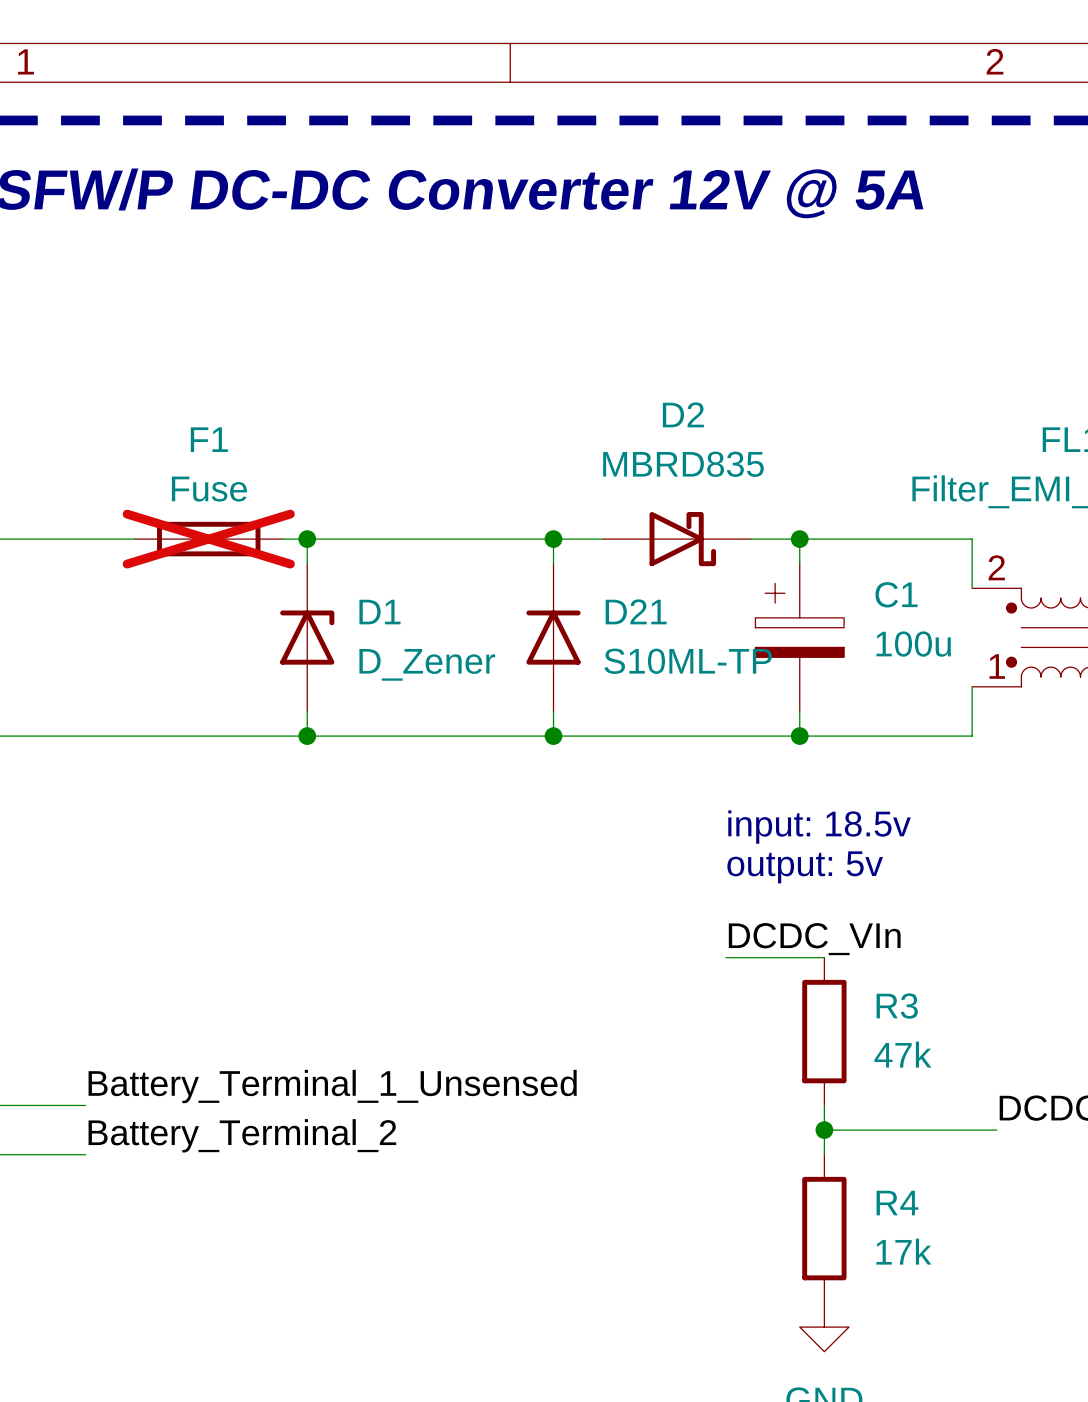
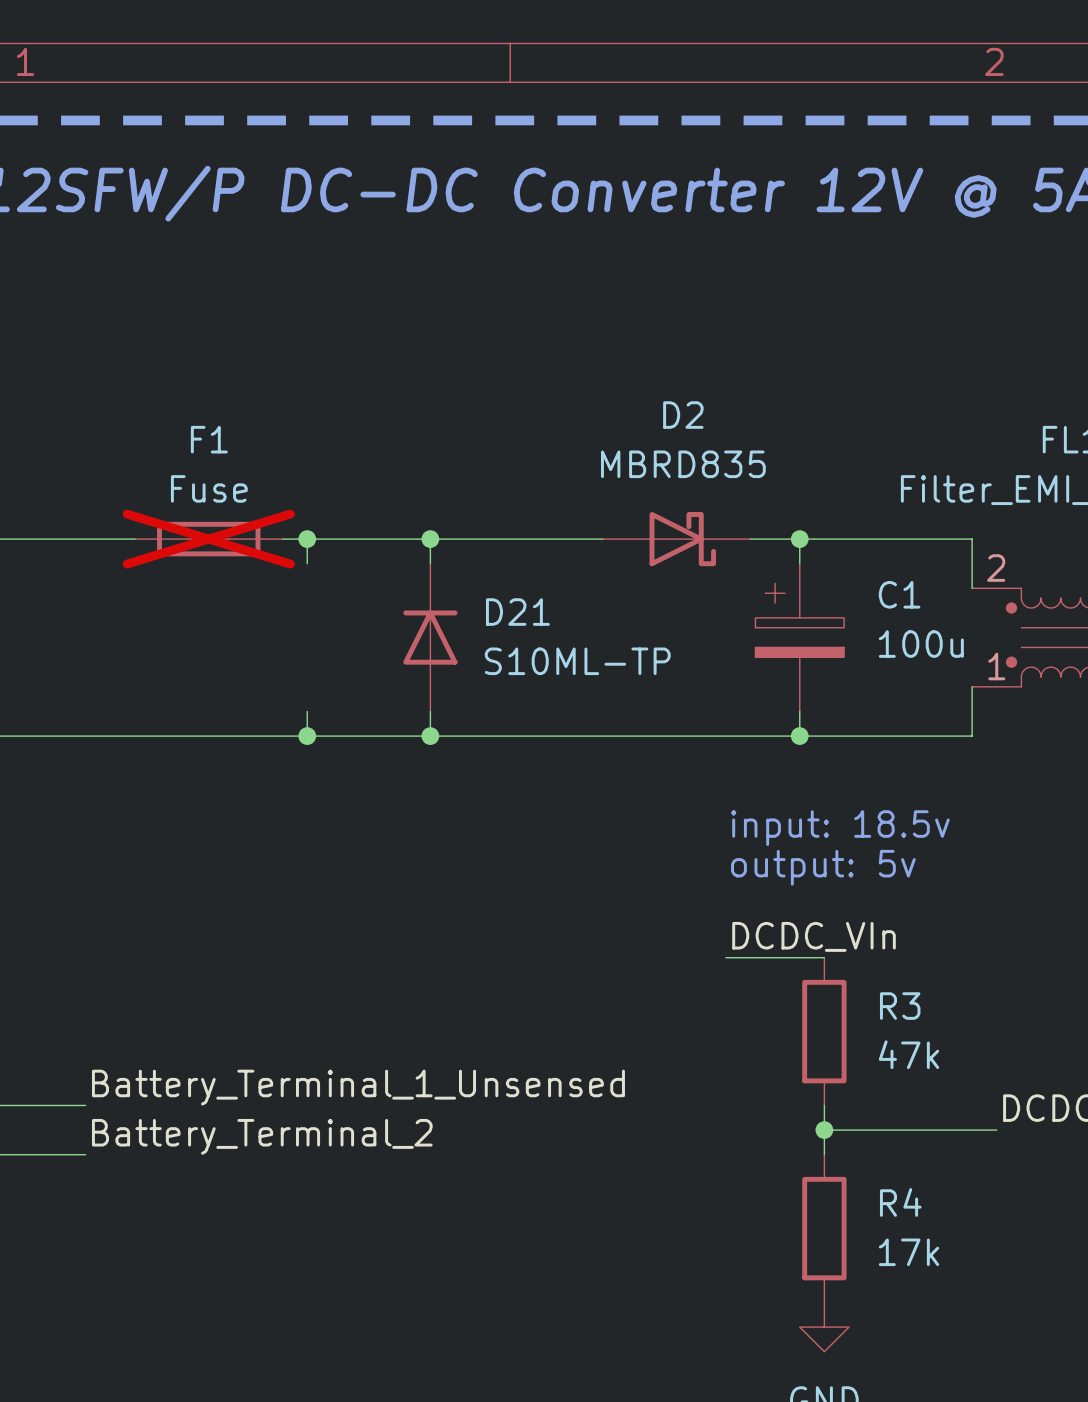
junction: none -> (430, 539)
wire: (553, 539) (553, 563) -> (430, 539) (430, 563)
junction: (553, 539) -> none
D1: D_Zener (307, 637) -> none
D21 position: (553, 637) -> (430, 637)
wire: (553, 711) (553, 736) -> (430, 711) (430, 736)
junction: none -> (430, 736)
junction: (553, 736) -> none

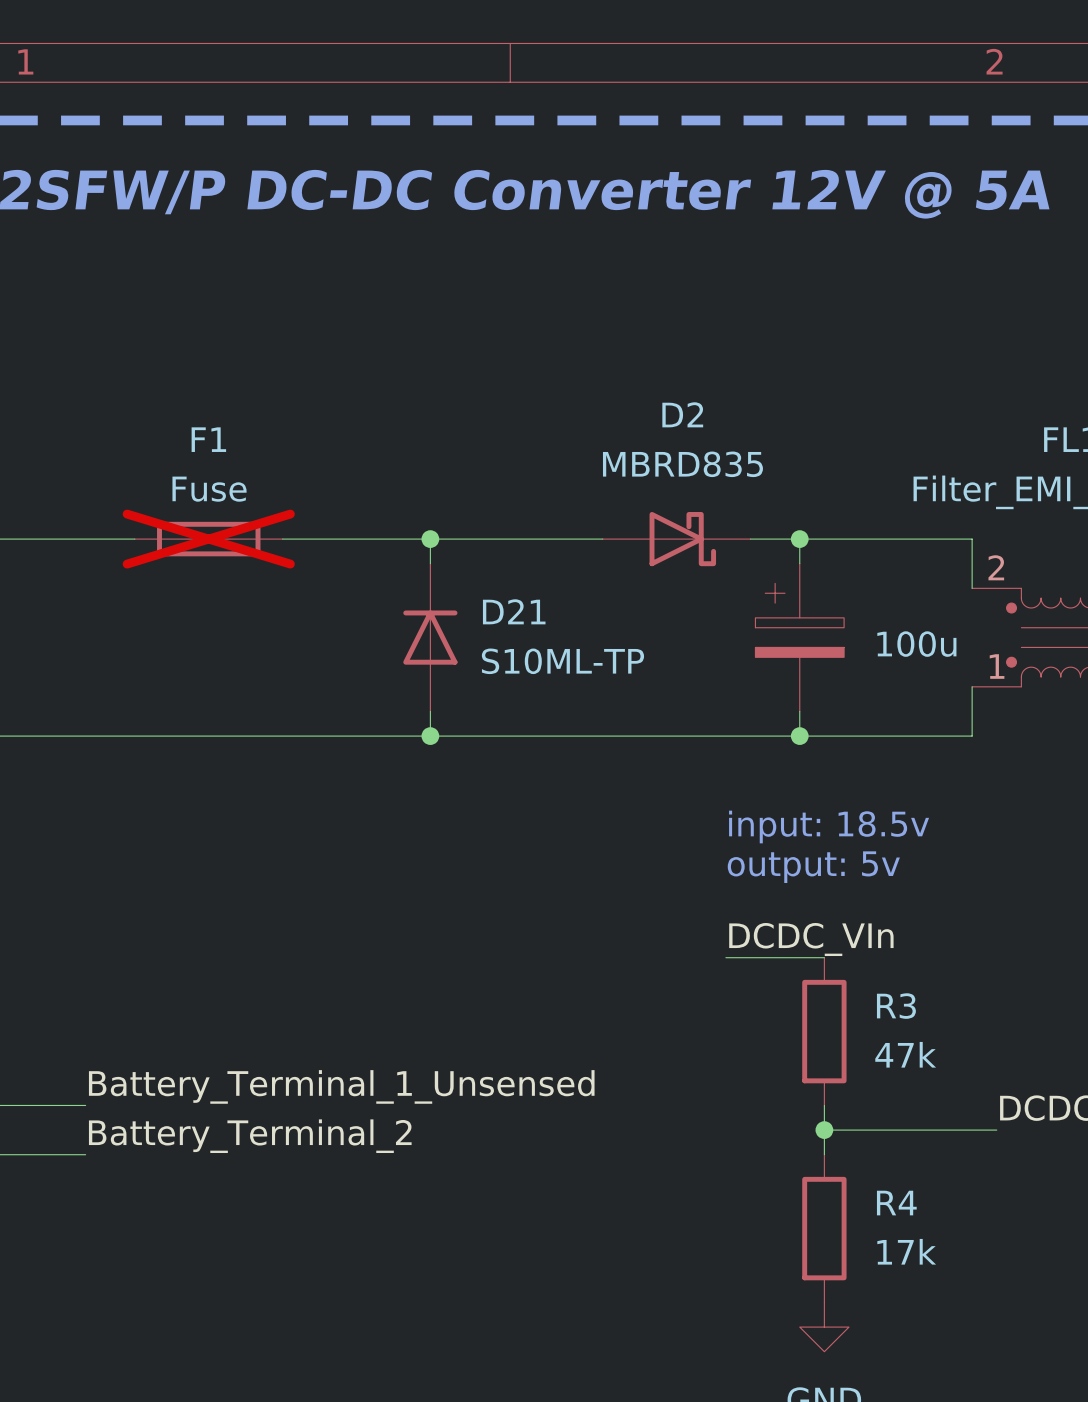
wire: (307, 539) (307, 563) -> none
junction: (307, 539) -> none
C1 name: C1 (899, 594) -> none
wire: (307, 711) (307, 736) -> none
junction: (307, 736) -> none

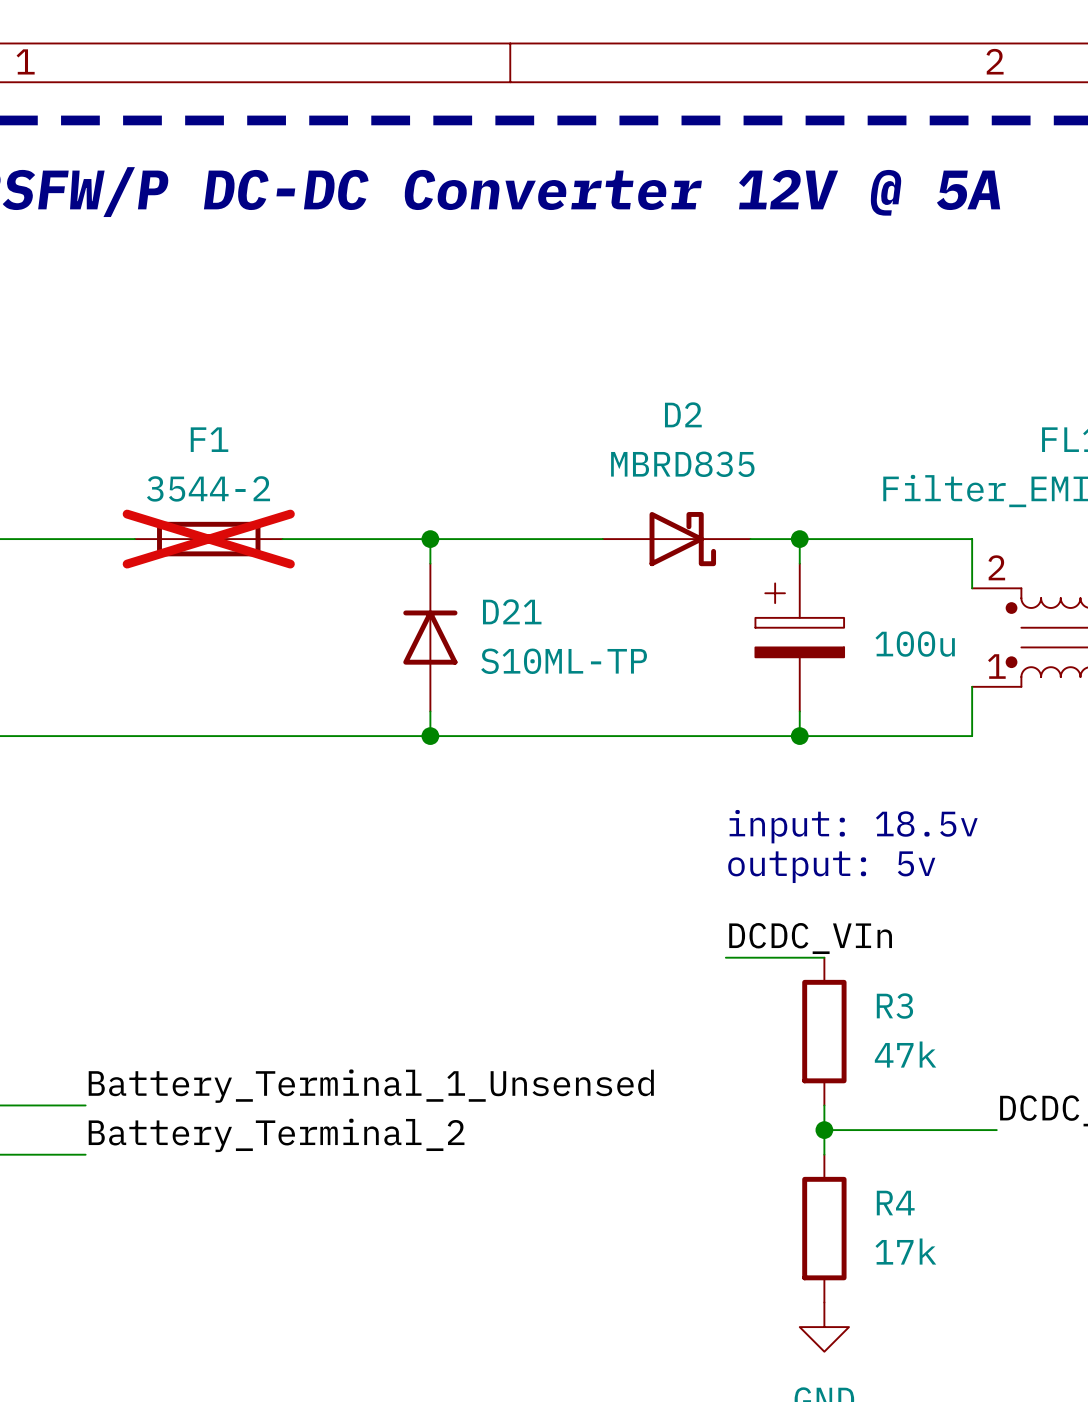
F1 value: Fuse (209, 489) -> 3544-2 (208, 488)

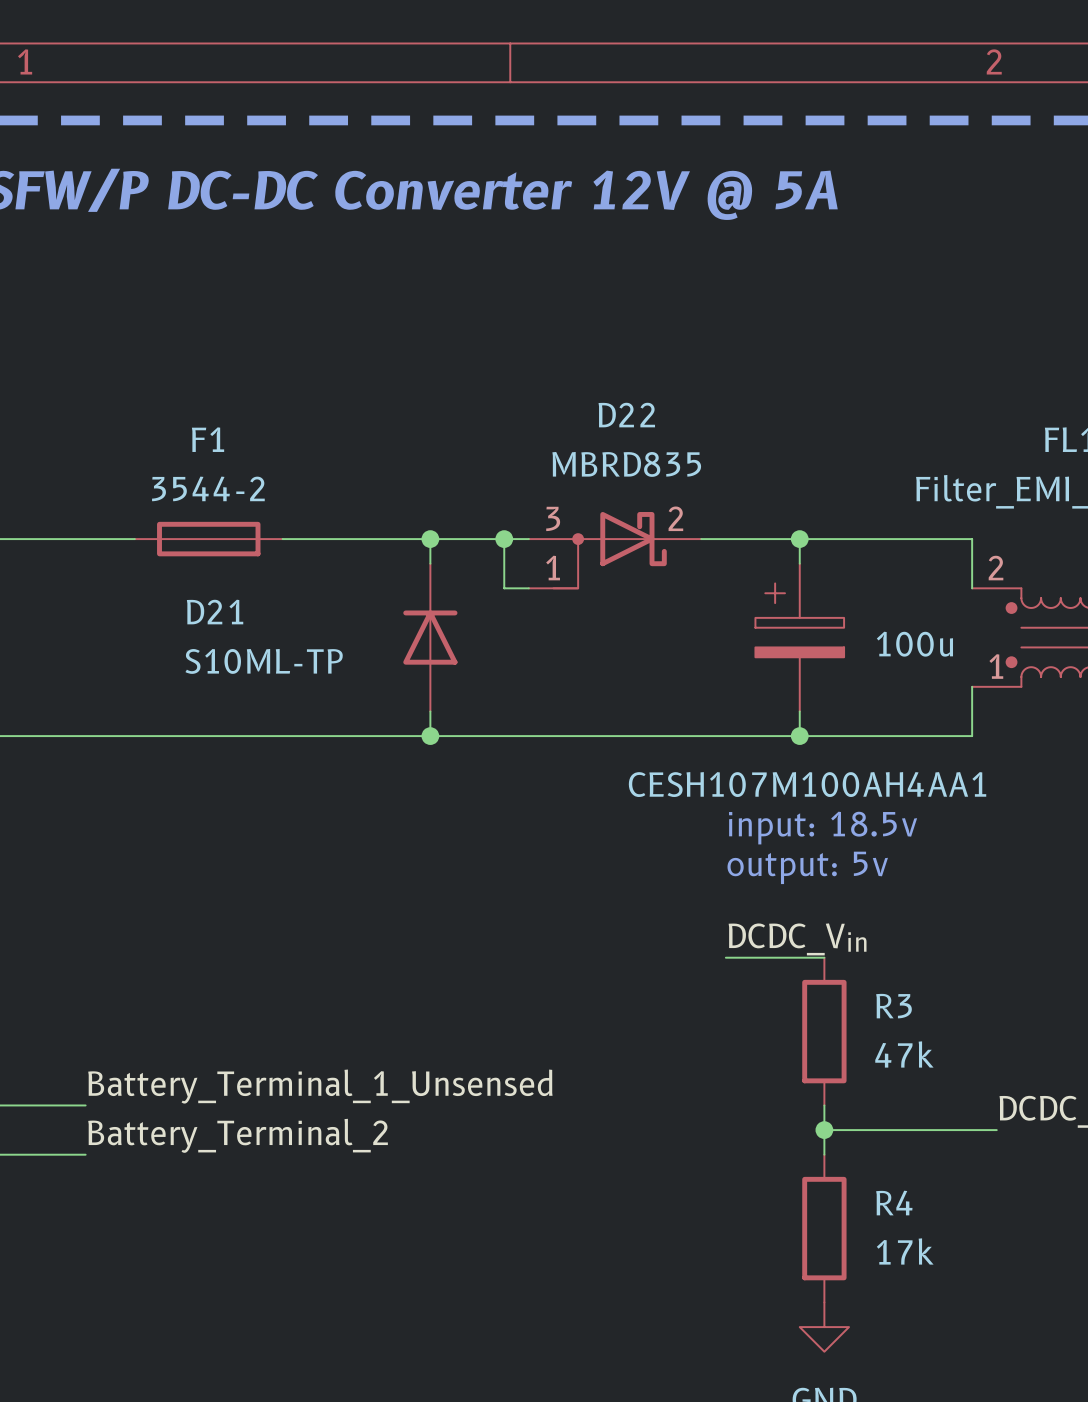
F1 do-not-place cross: (208, 539) -> none
wire: none -> (504, 539) (504, 588) (528, 588)
junction: none -> (504, 539)
D2: MBRD835 (676, 539) -> none
D22: none -> MBRD835 (615, 550)
D21 name position: D21 (512, 611) -> D21 (215, 612)
D21 value position: S10ML-TP (564, 661) -> S10ML-TP (264, 661)
CESH107M100AH4AA1 name: none -> CESH107M100AH4AA1 (807, 784)
label: DCDC_VIn (810, 938) -> DCDC_Vin (797, 939)

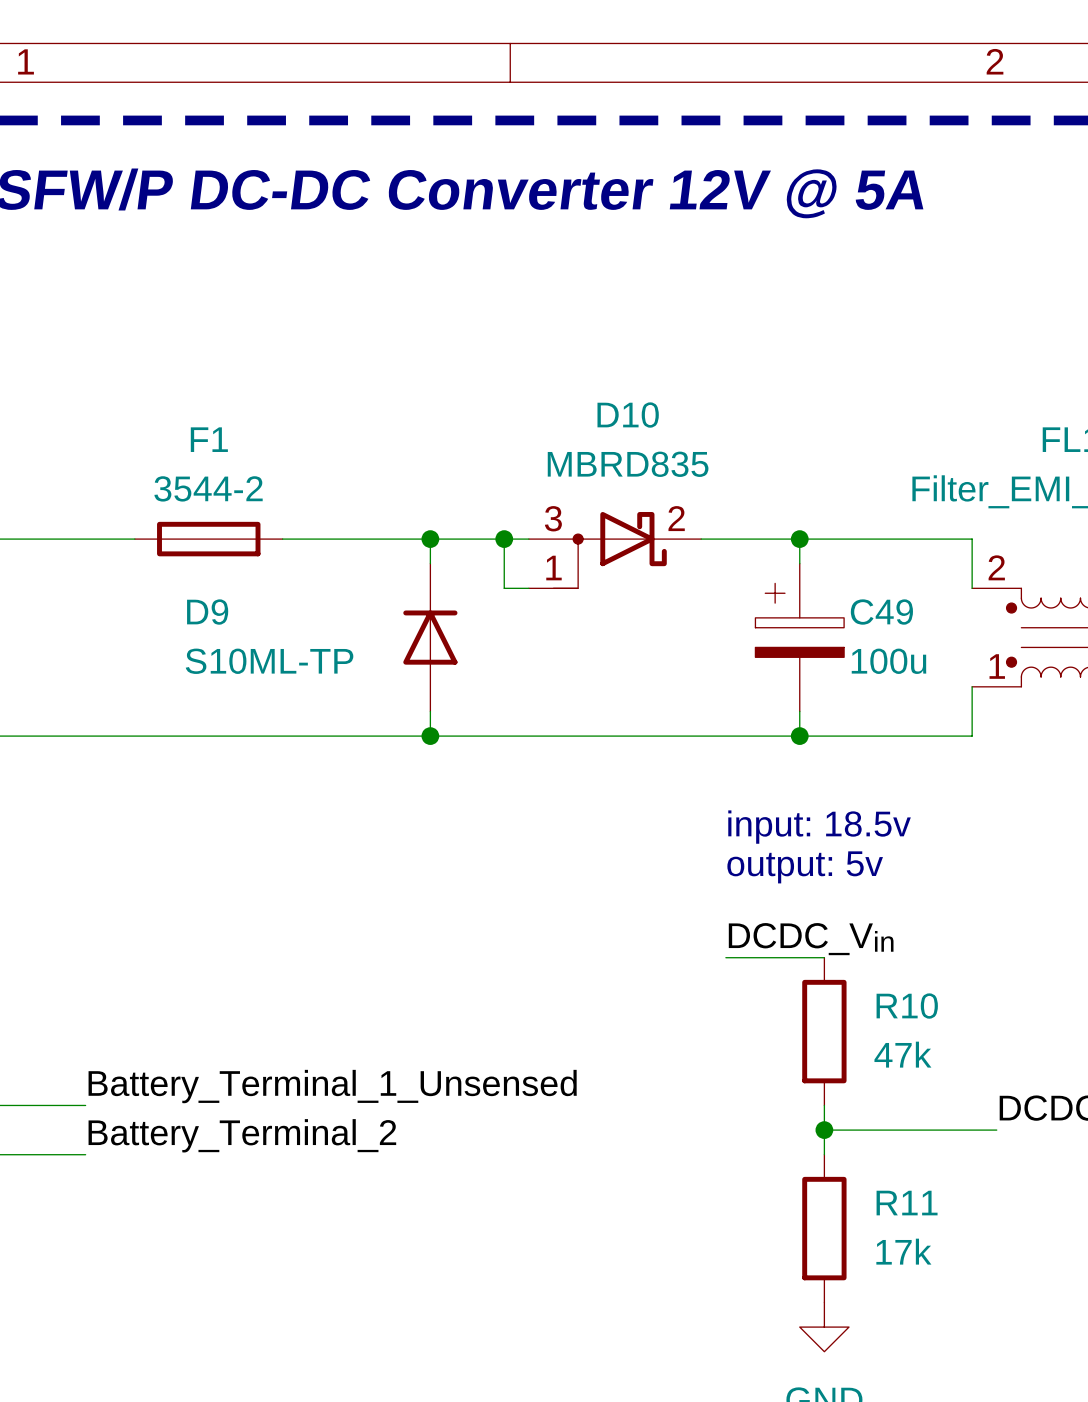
D22 name: D22 (626, 415) -> D10 (628, 415)
D21 name: D21 (215, 612) -> D9 (207, 612)
CESH107M100AH4AA1 value position: 100u (914, 644) -> 100u (888, 661)
CESH107M100AH4AA1 name: CESH107M100AH4AA1 (807, 784) -> C49 (881, 612)
R3 name: R3 (893, 1006) -> R10 (907, 1006)
R4 name: R4 (894, 1203) -> R11 (907, 1203)

